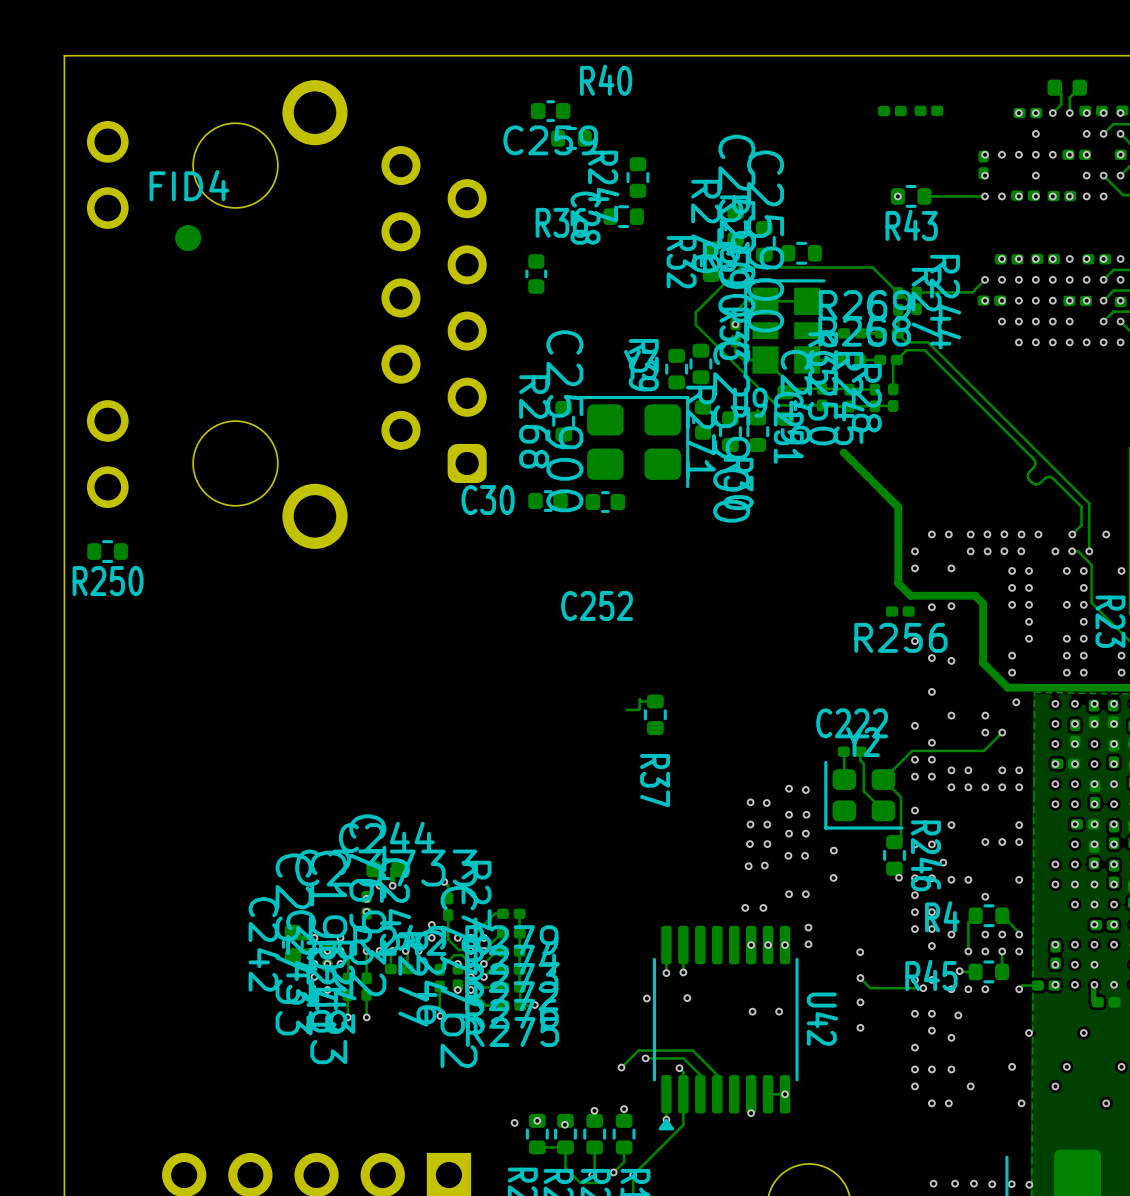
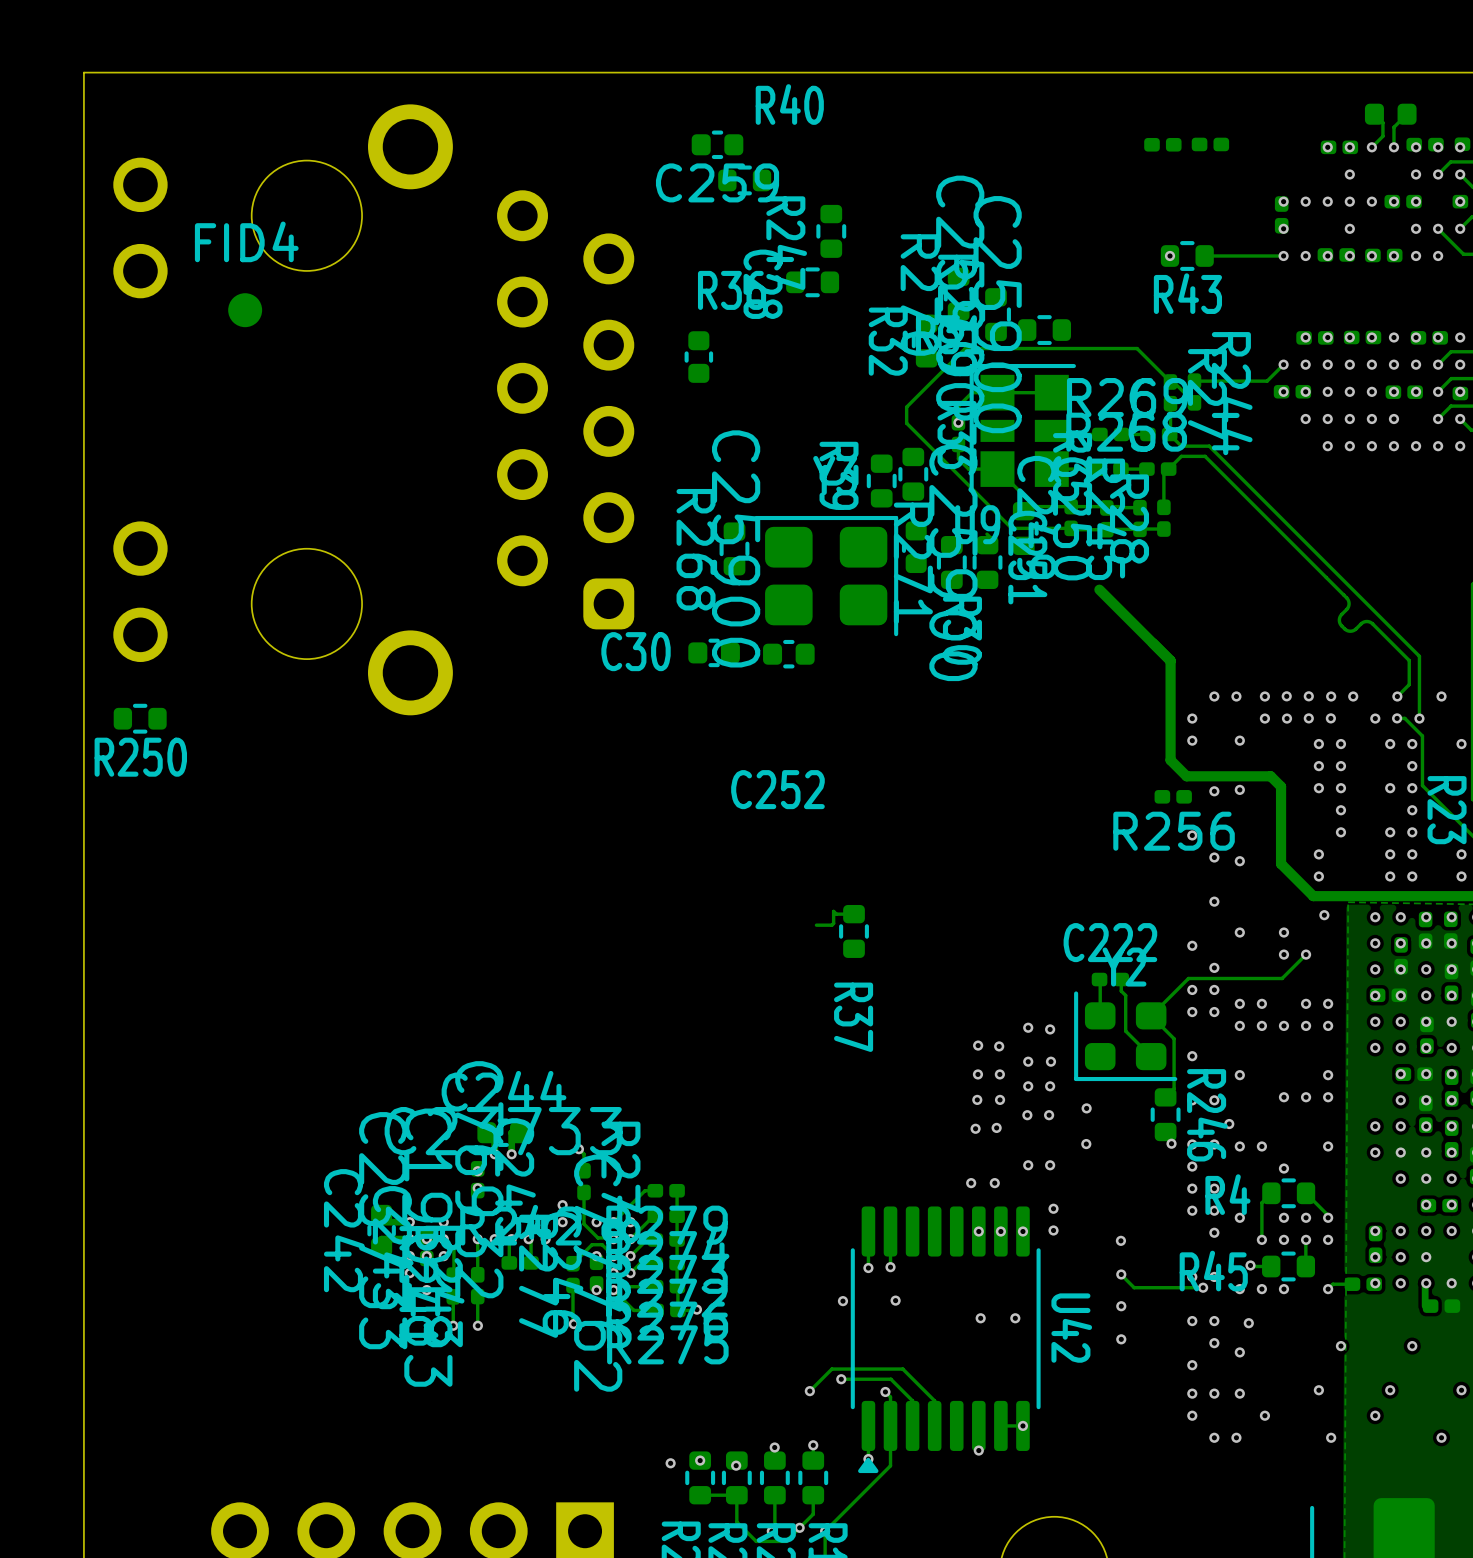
via: (933, 1183) -> none
via: (955, 1183) -> none
via: (973, 1183) -> none
via: (992, 1184) -> none
via: (1011, 1184) -> none
via: (1029, 1184) -> none

